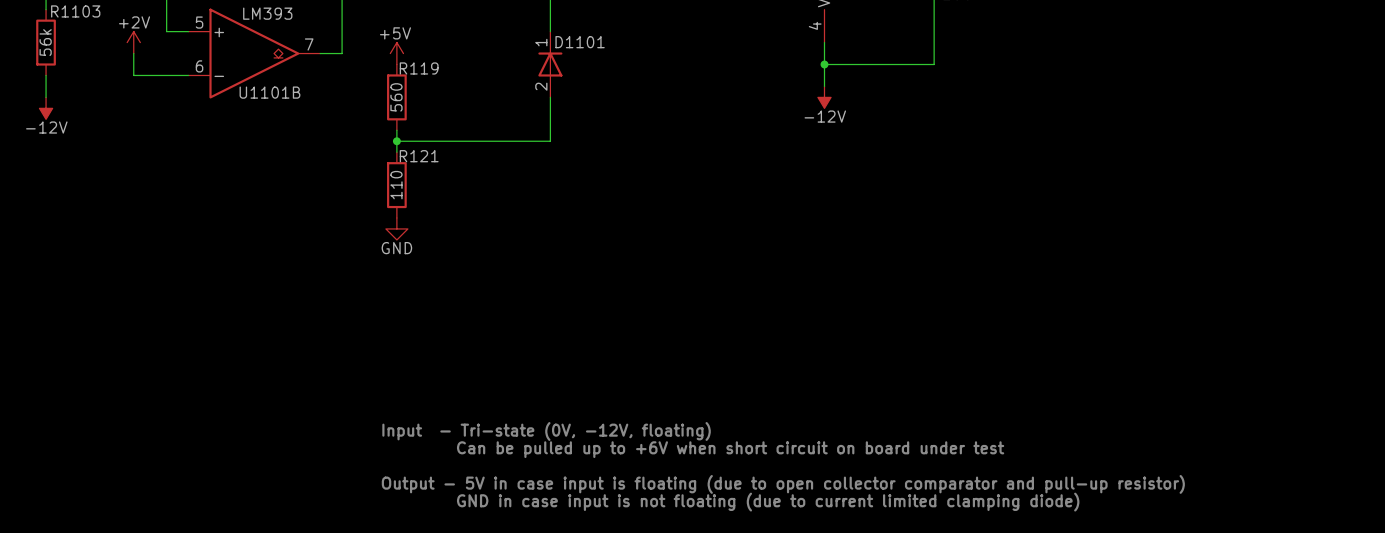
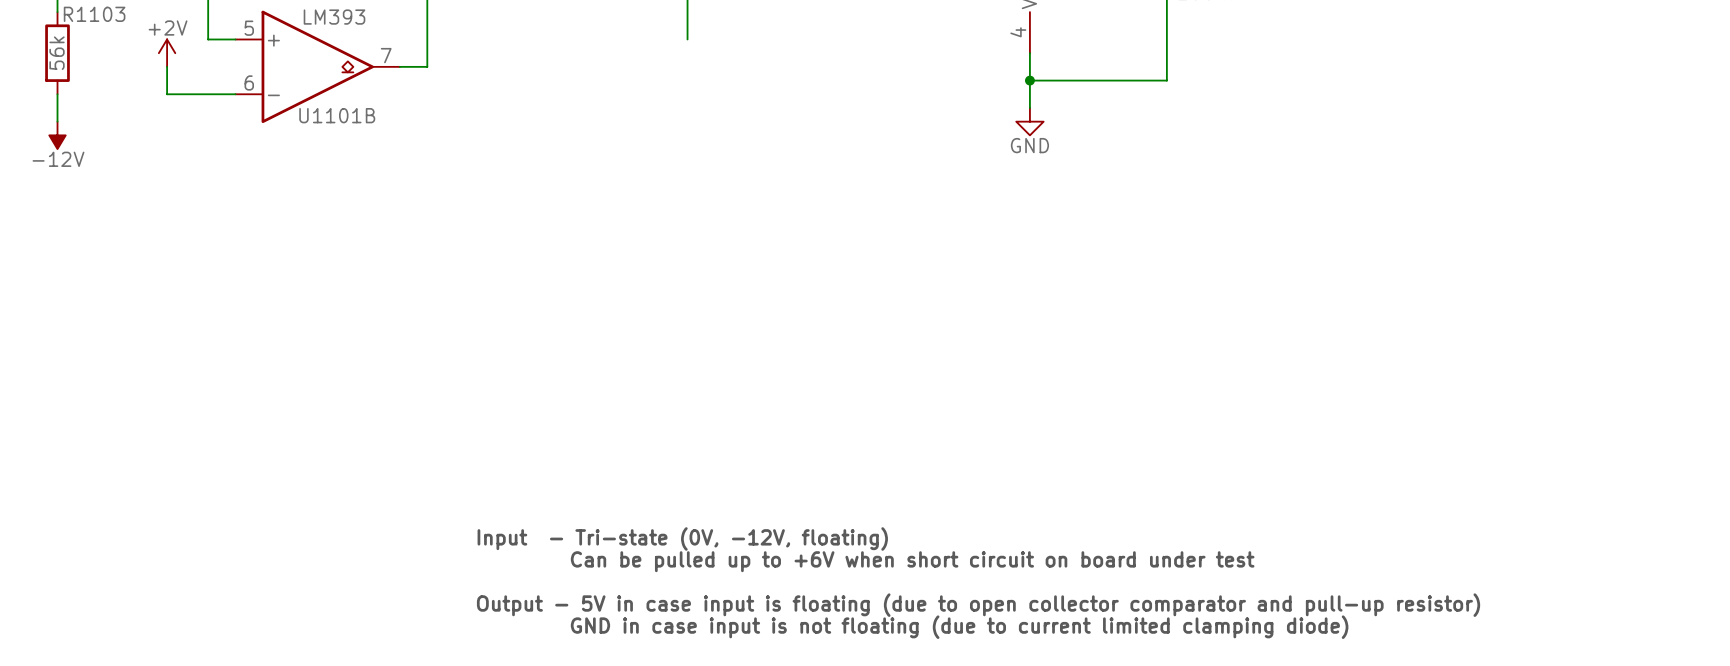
power symbol: +5V (396, 53) -> none
D1101: (550, 64) -> none
R119: 560 (396, 97) -> none
wire: (550, 97) (550, 141) (396, 141) -> none
power symbol: -12V (824, 97) -> GND (1029, 121)
wire: (396, 130) (396, 152) -> none
junction: (396, 141) -> none
R121: 110 (396, 185) -> none
power symbol: GND (396, 228) -> none

